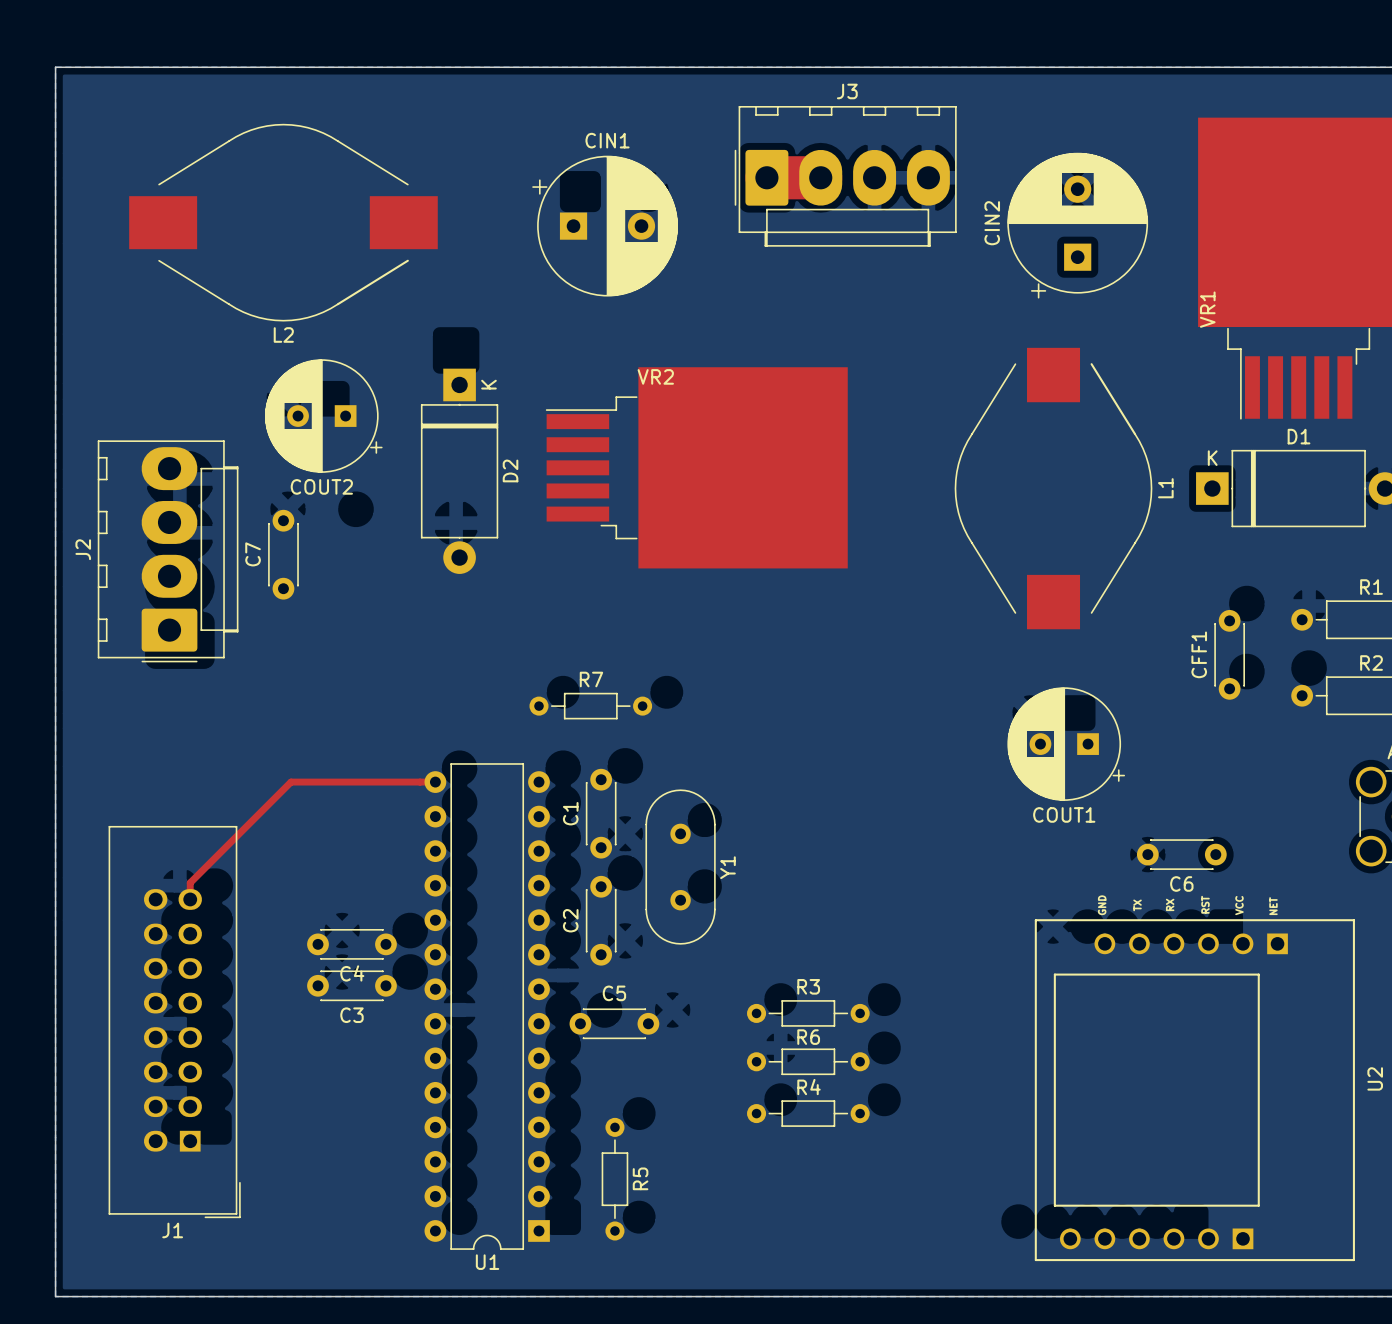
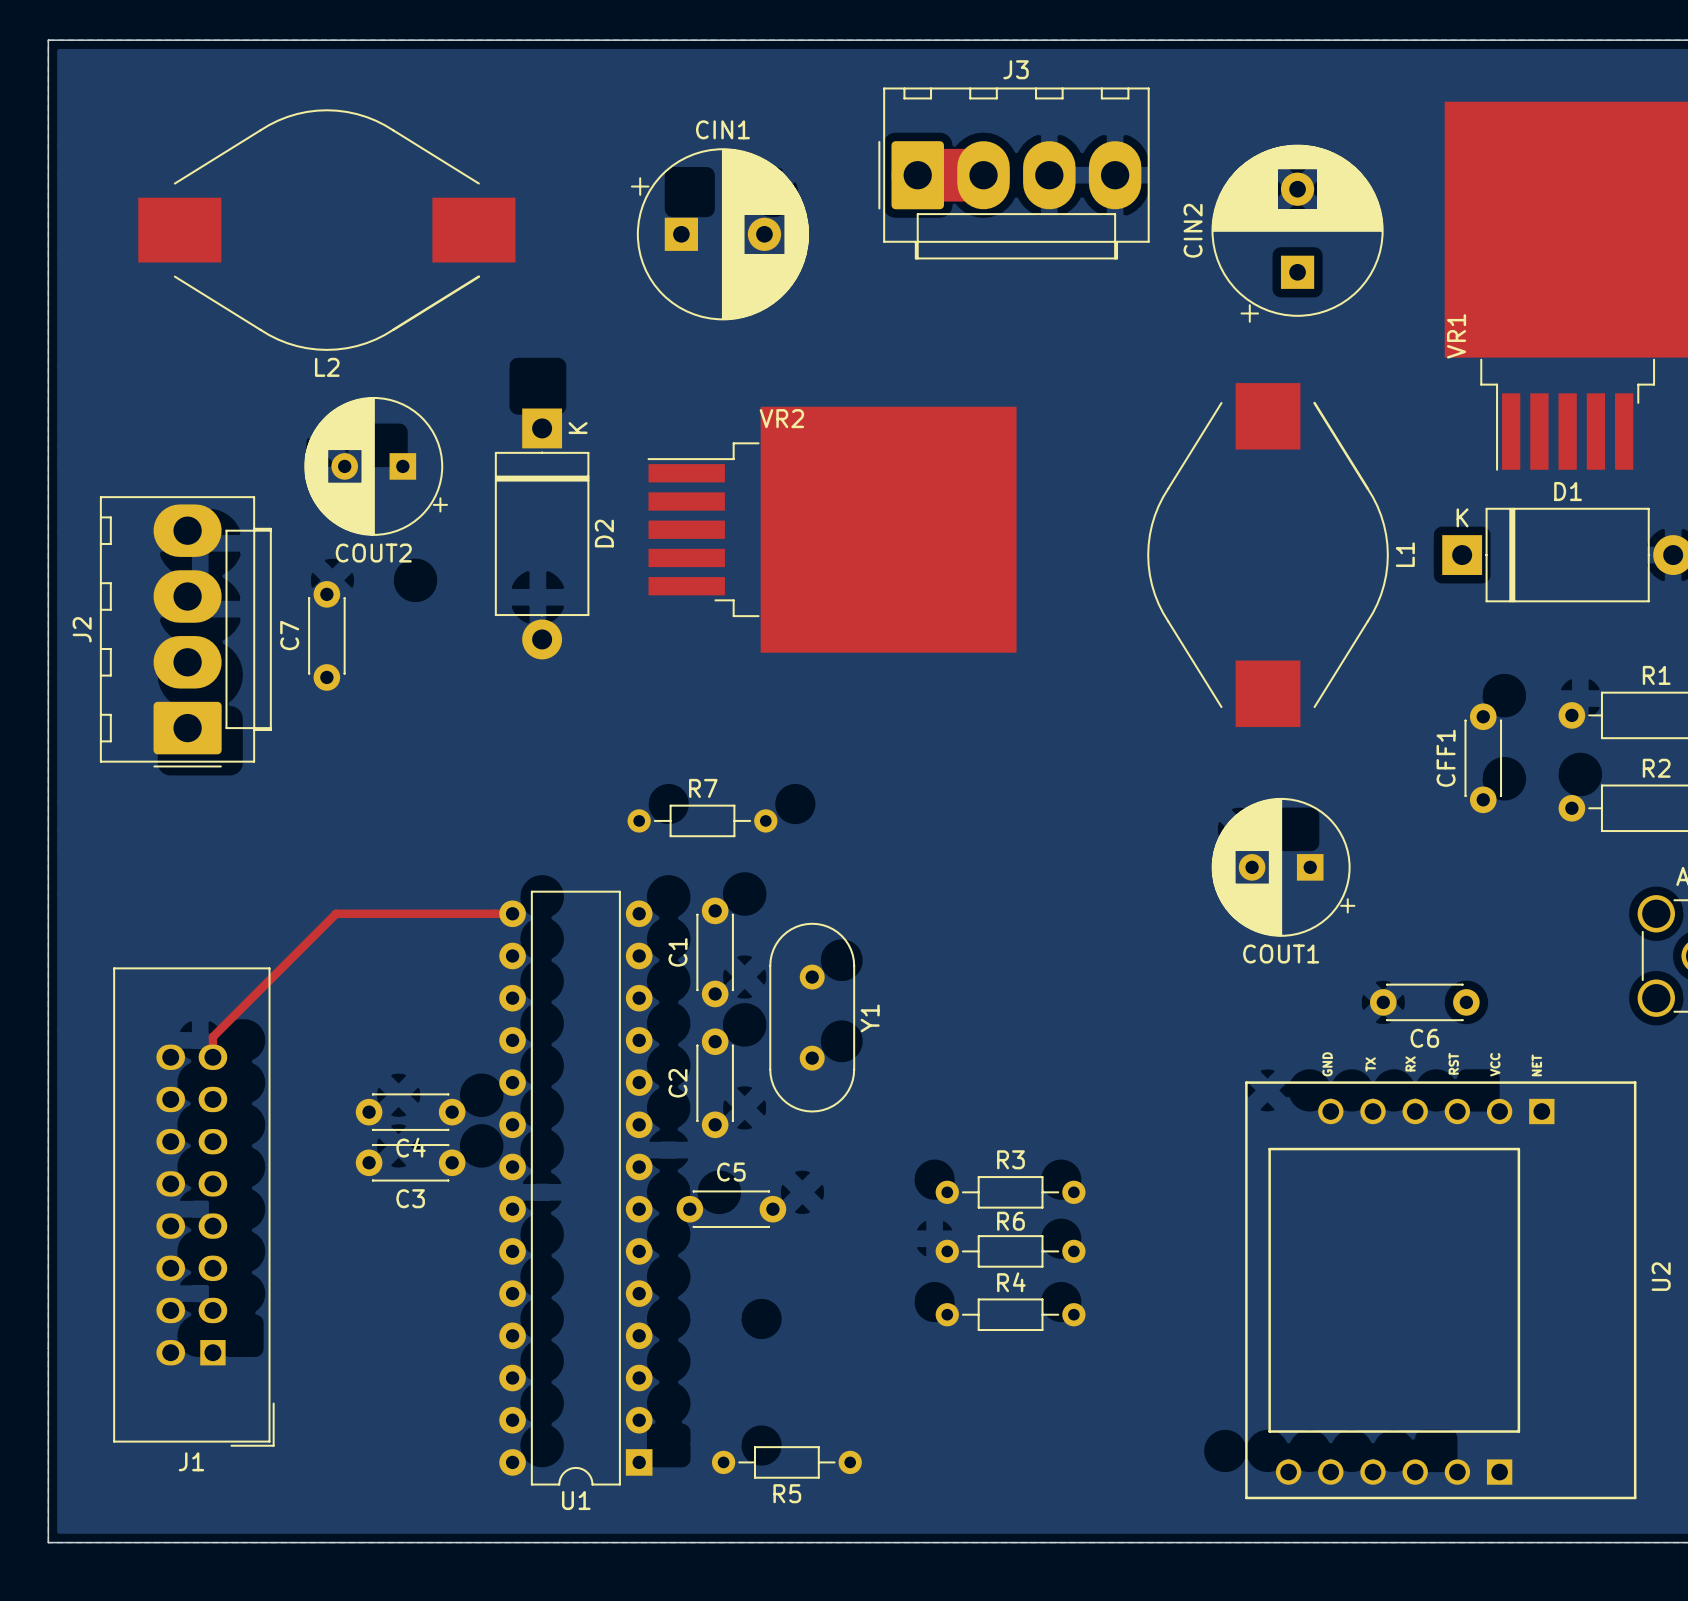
R3 position: (808, 1013) -> (1010, 1192)
R4 position: (808, 1061) -> (1010, 1251)
R6 position: (808, 1113) -> (1010, 1314)
R5 rotation: 0° (614, 1179) -> 90° clockwise (786, 1462)

